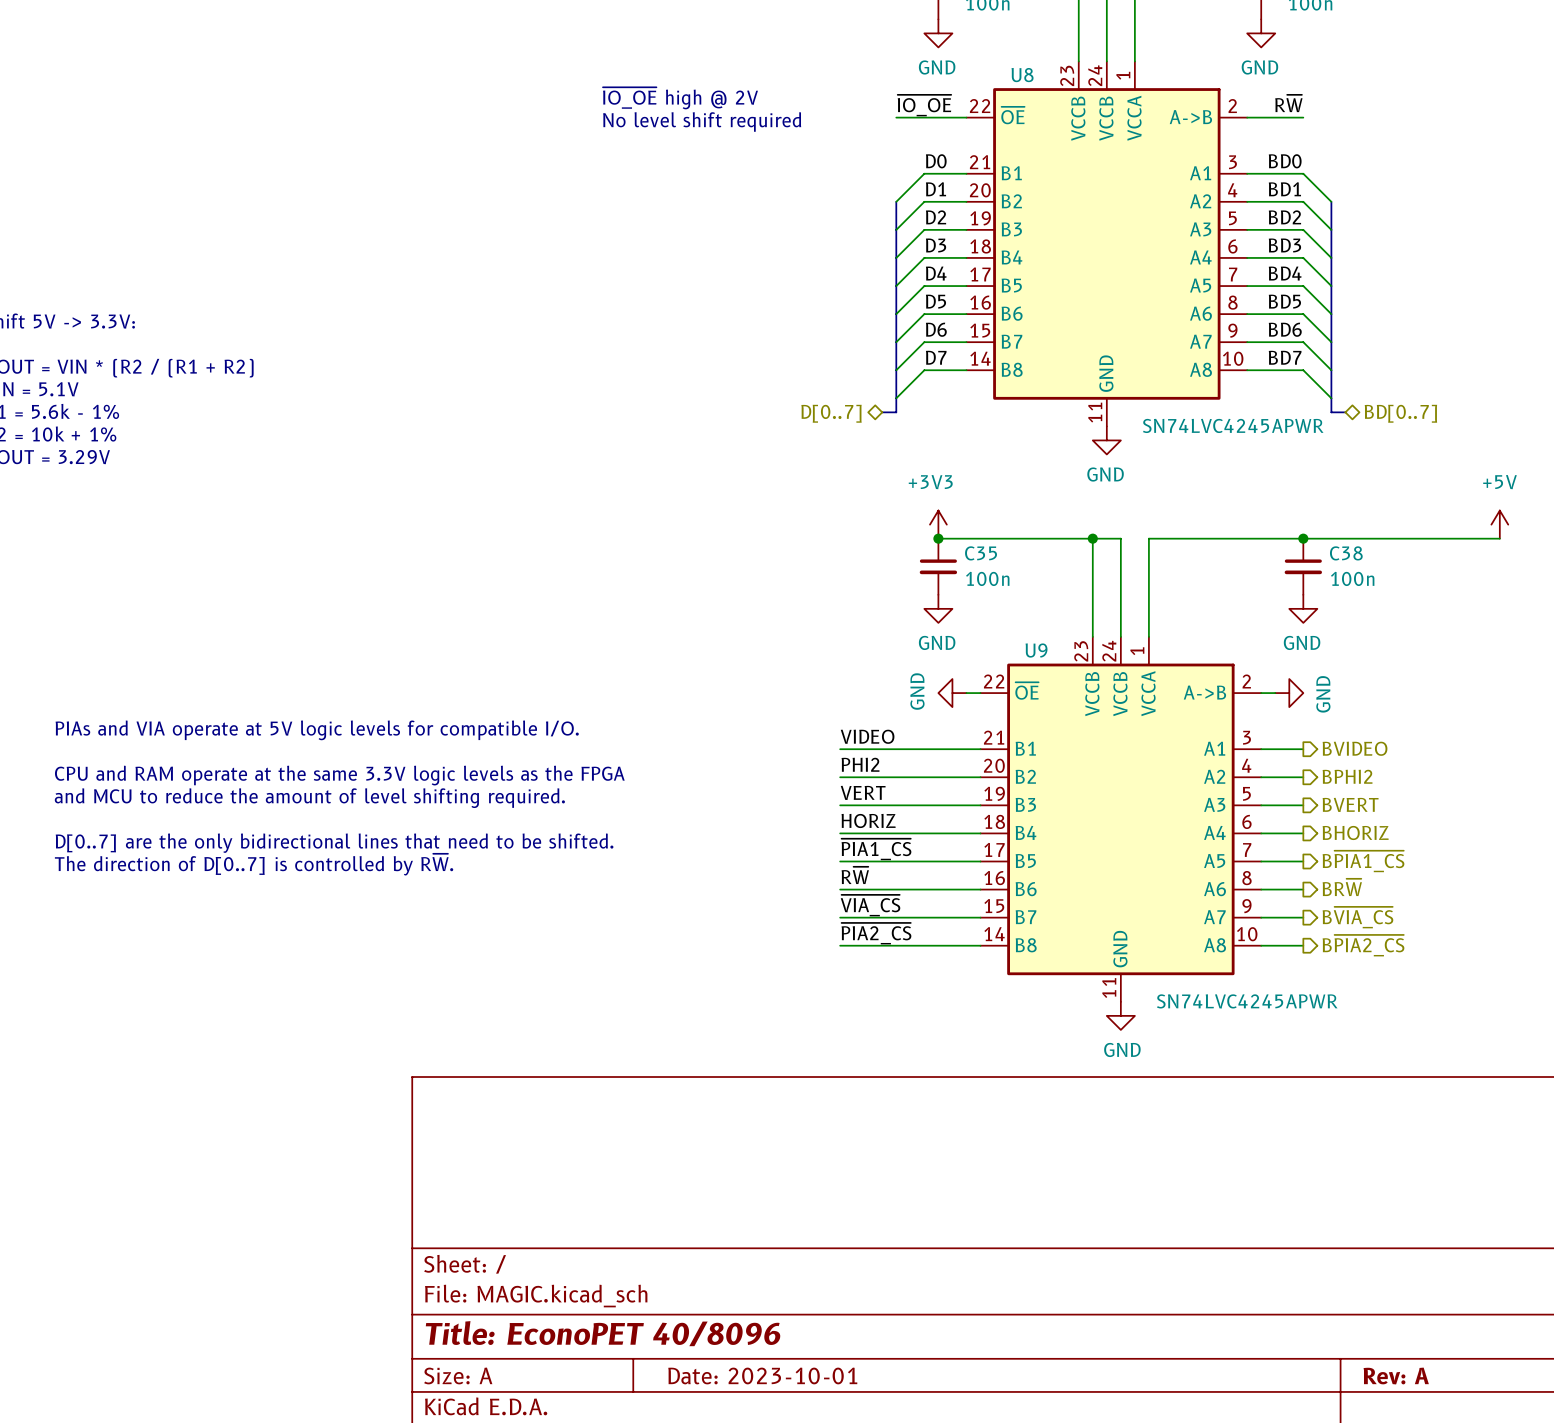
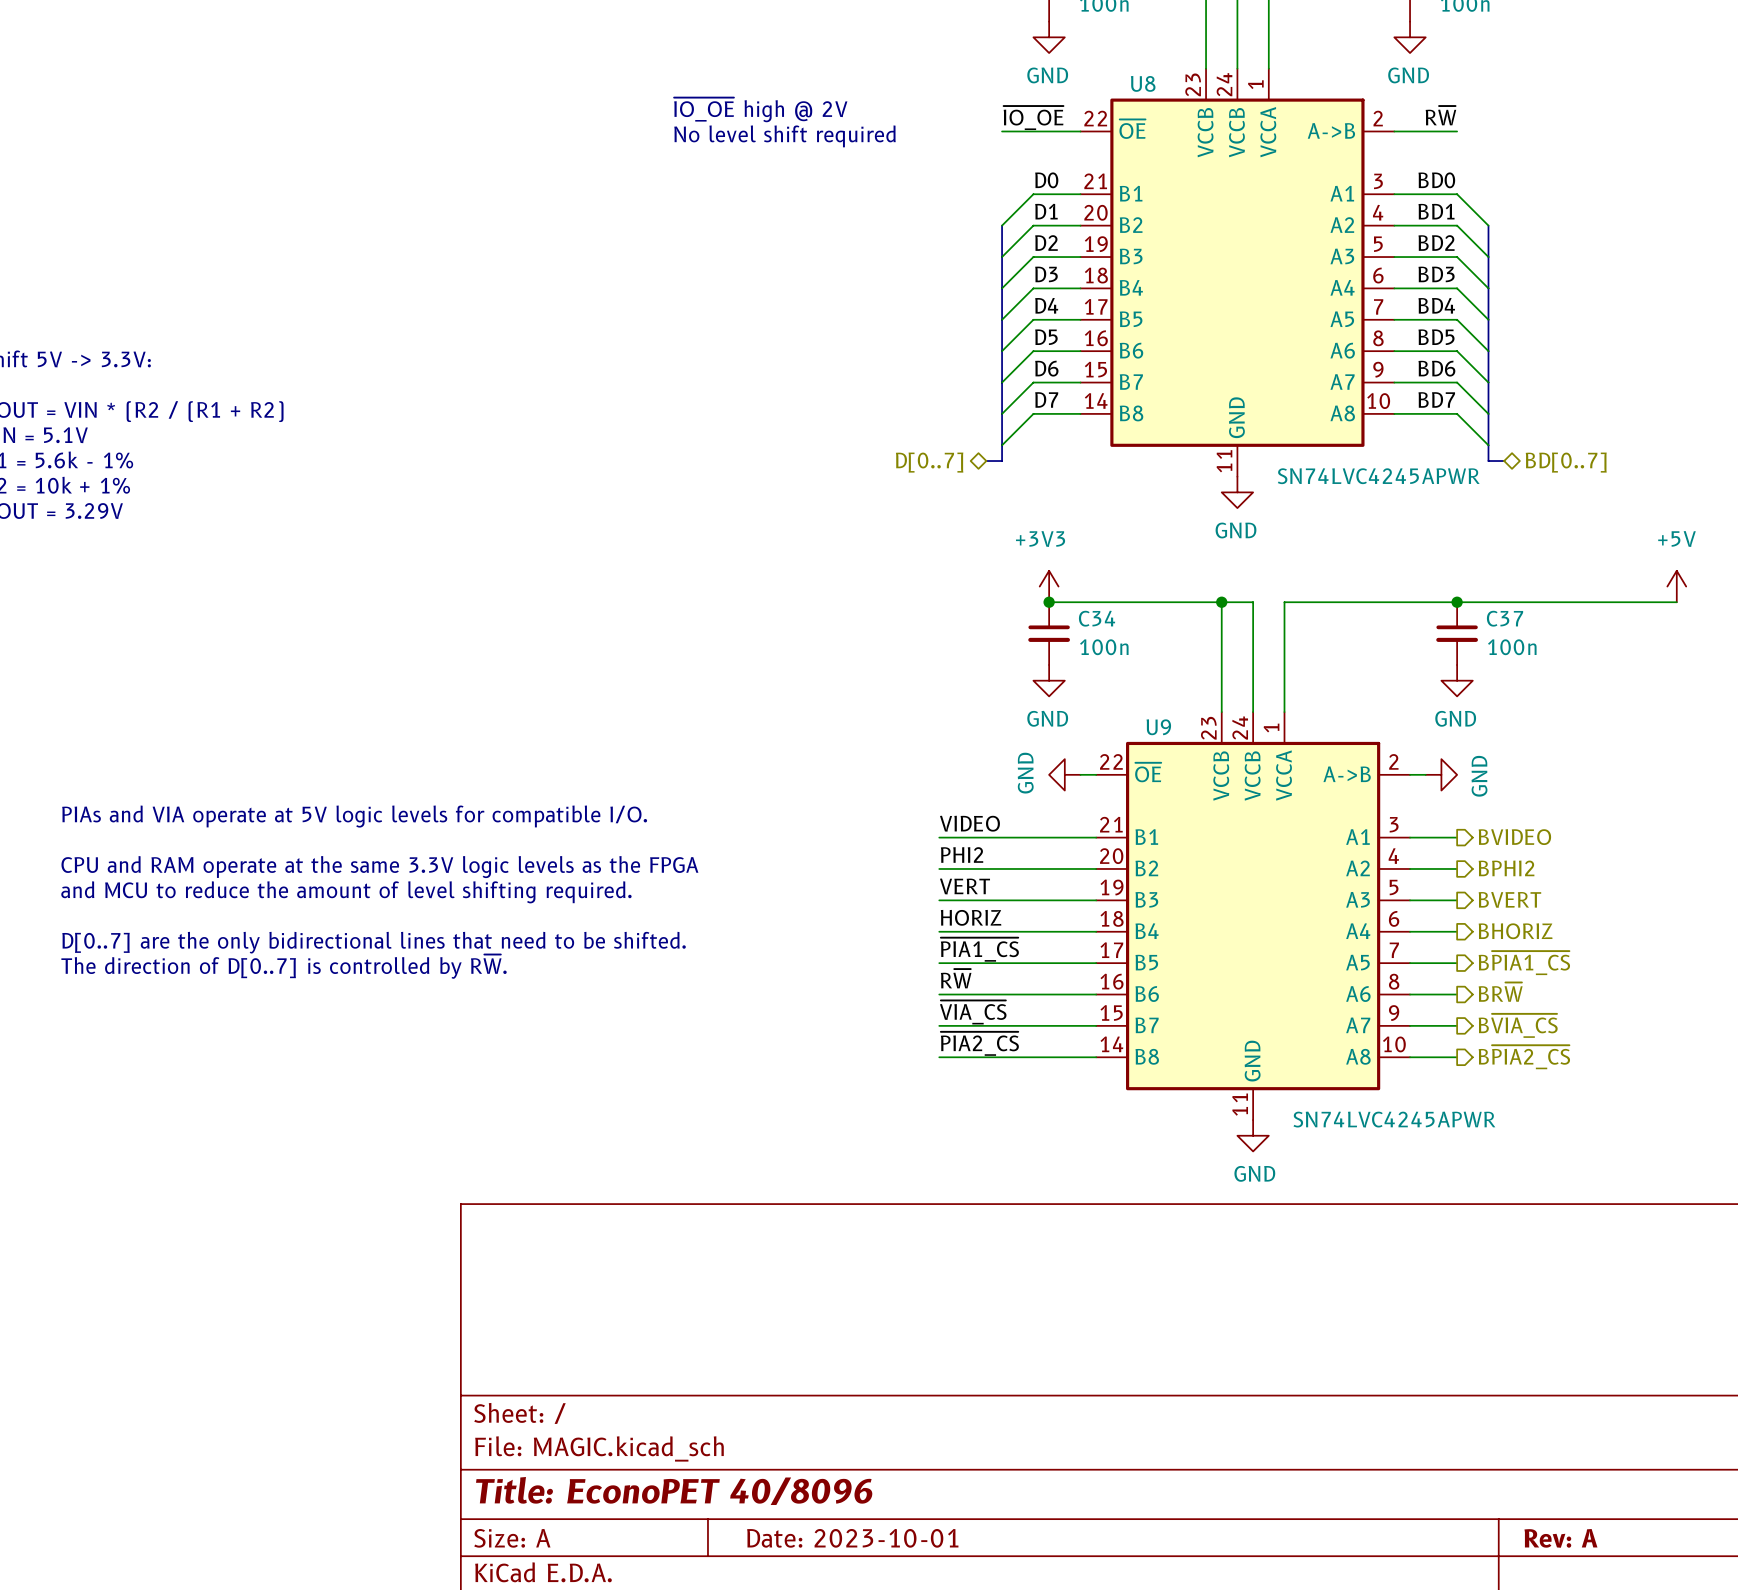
C35 name: C35 (981, 553) -> C34 (1097, 618)
C38 name: C38 (1346, 553) -> C37 (1505, 618)

